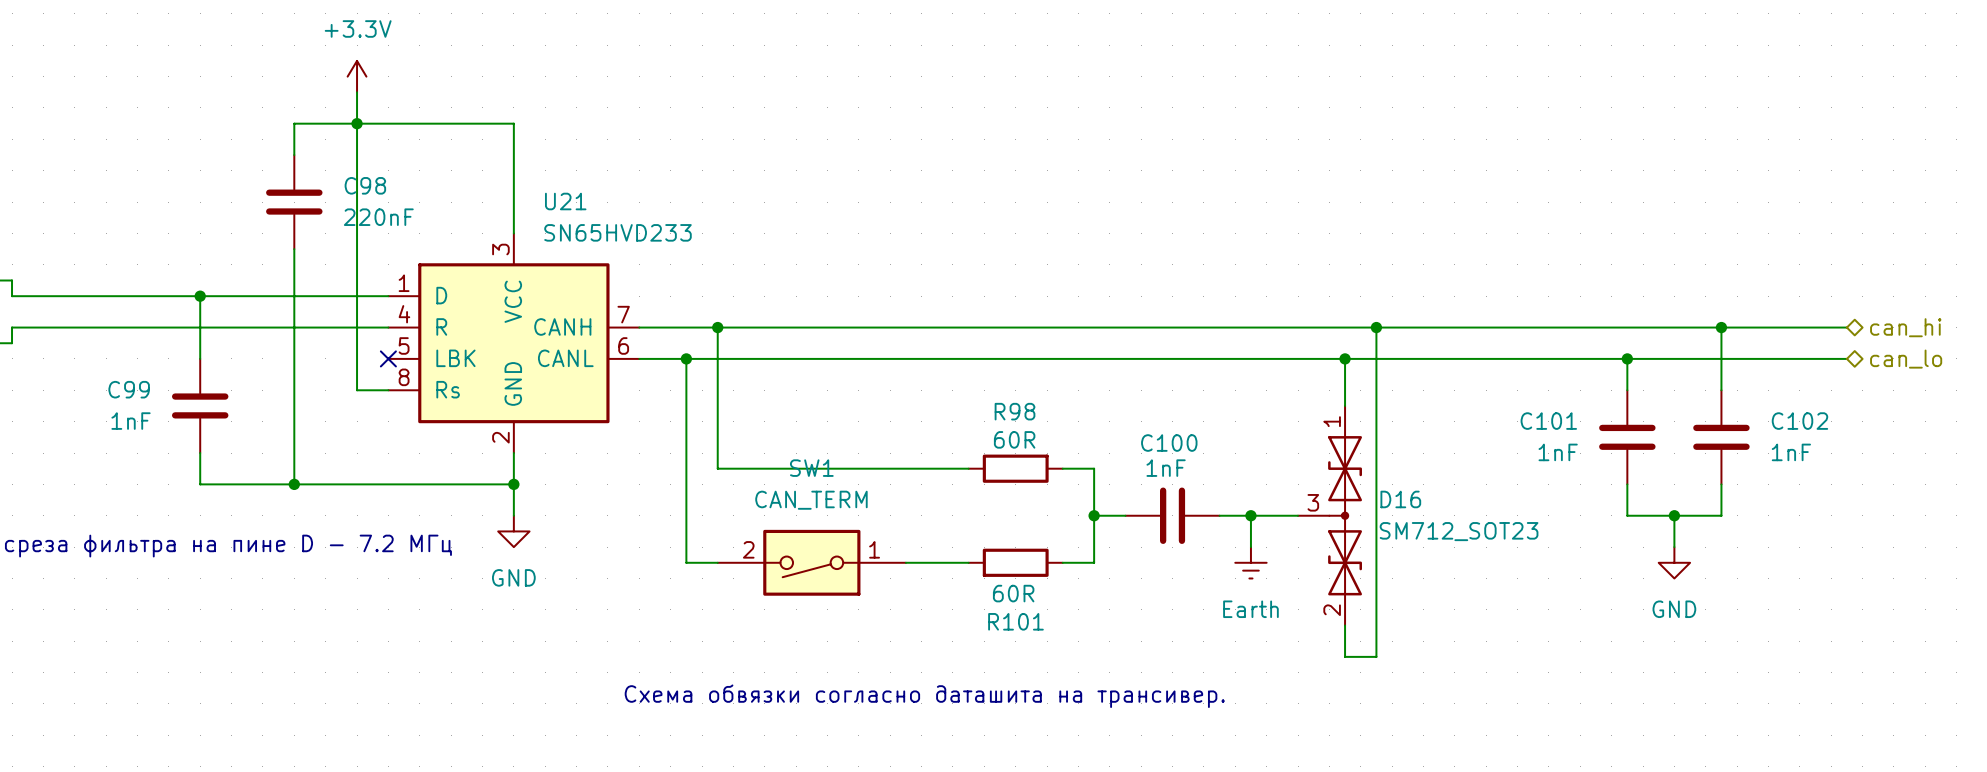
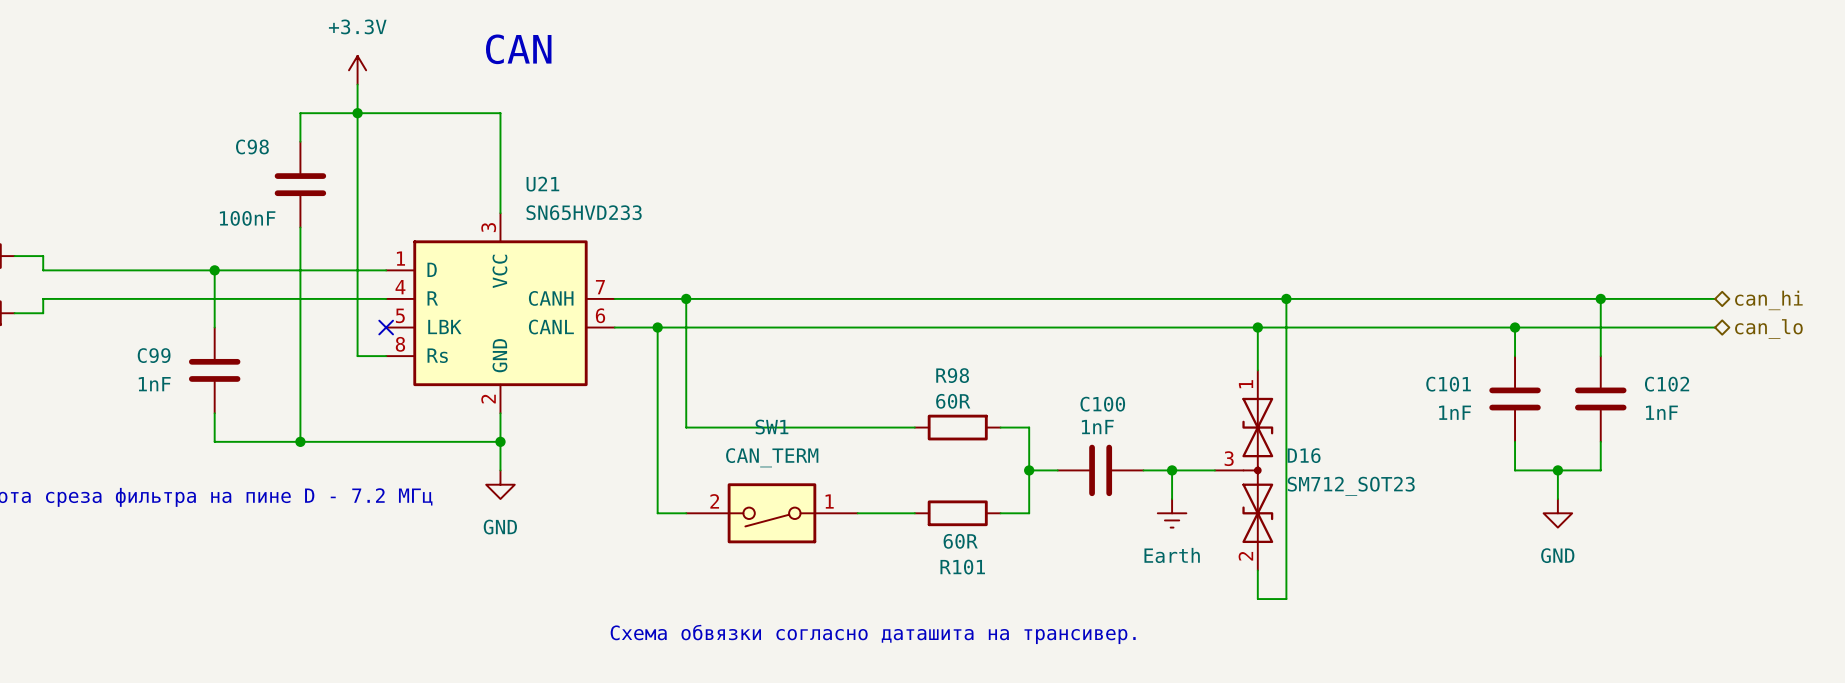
text: none -> CAN (518, 49)
C98 name position: C98 (365, 185) -> C98 (252, 146)
C98 value: 220nF (378, 217) -> 100nF (247, 218)

